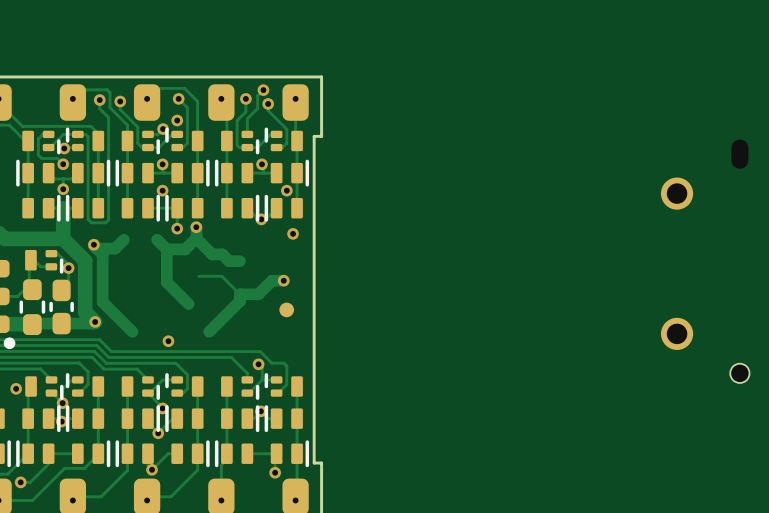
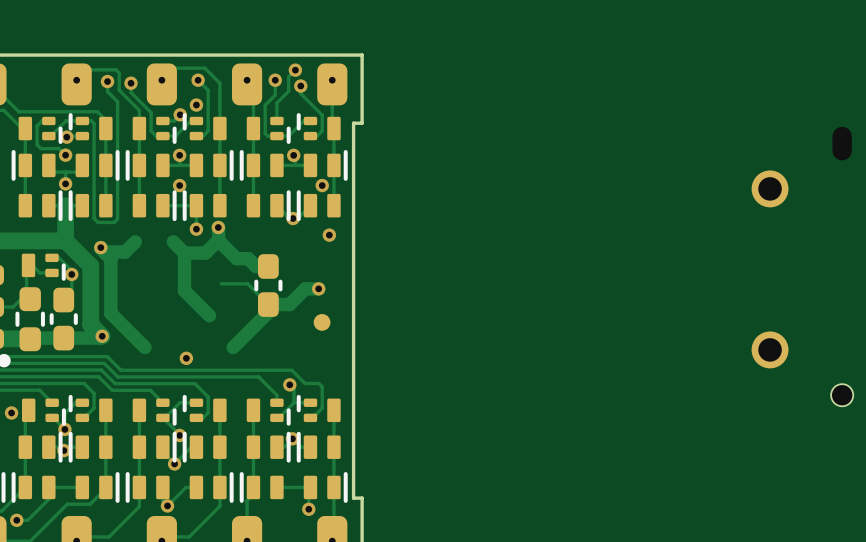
part: none -> (268, 285)

